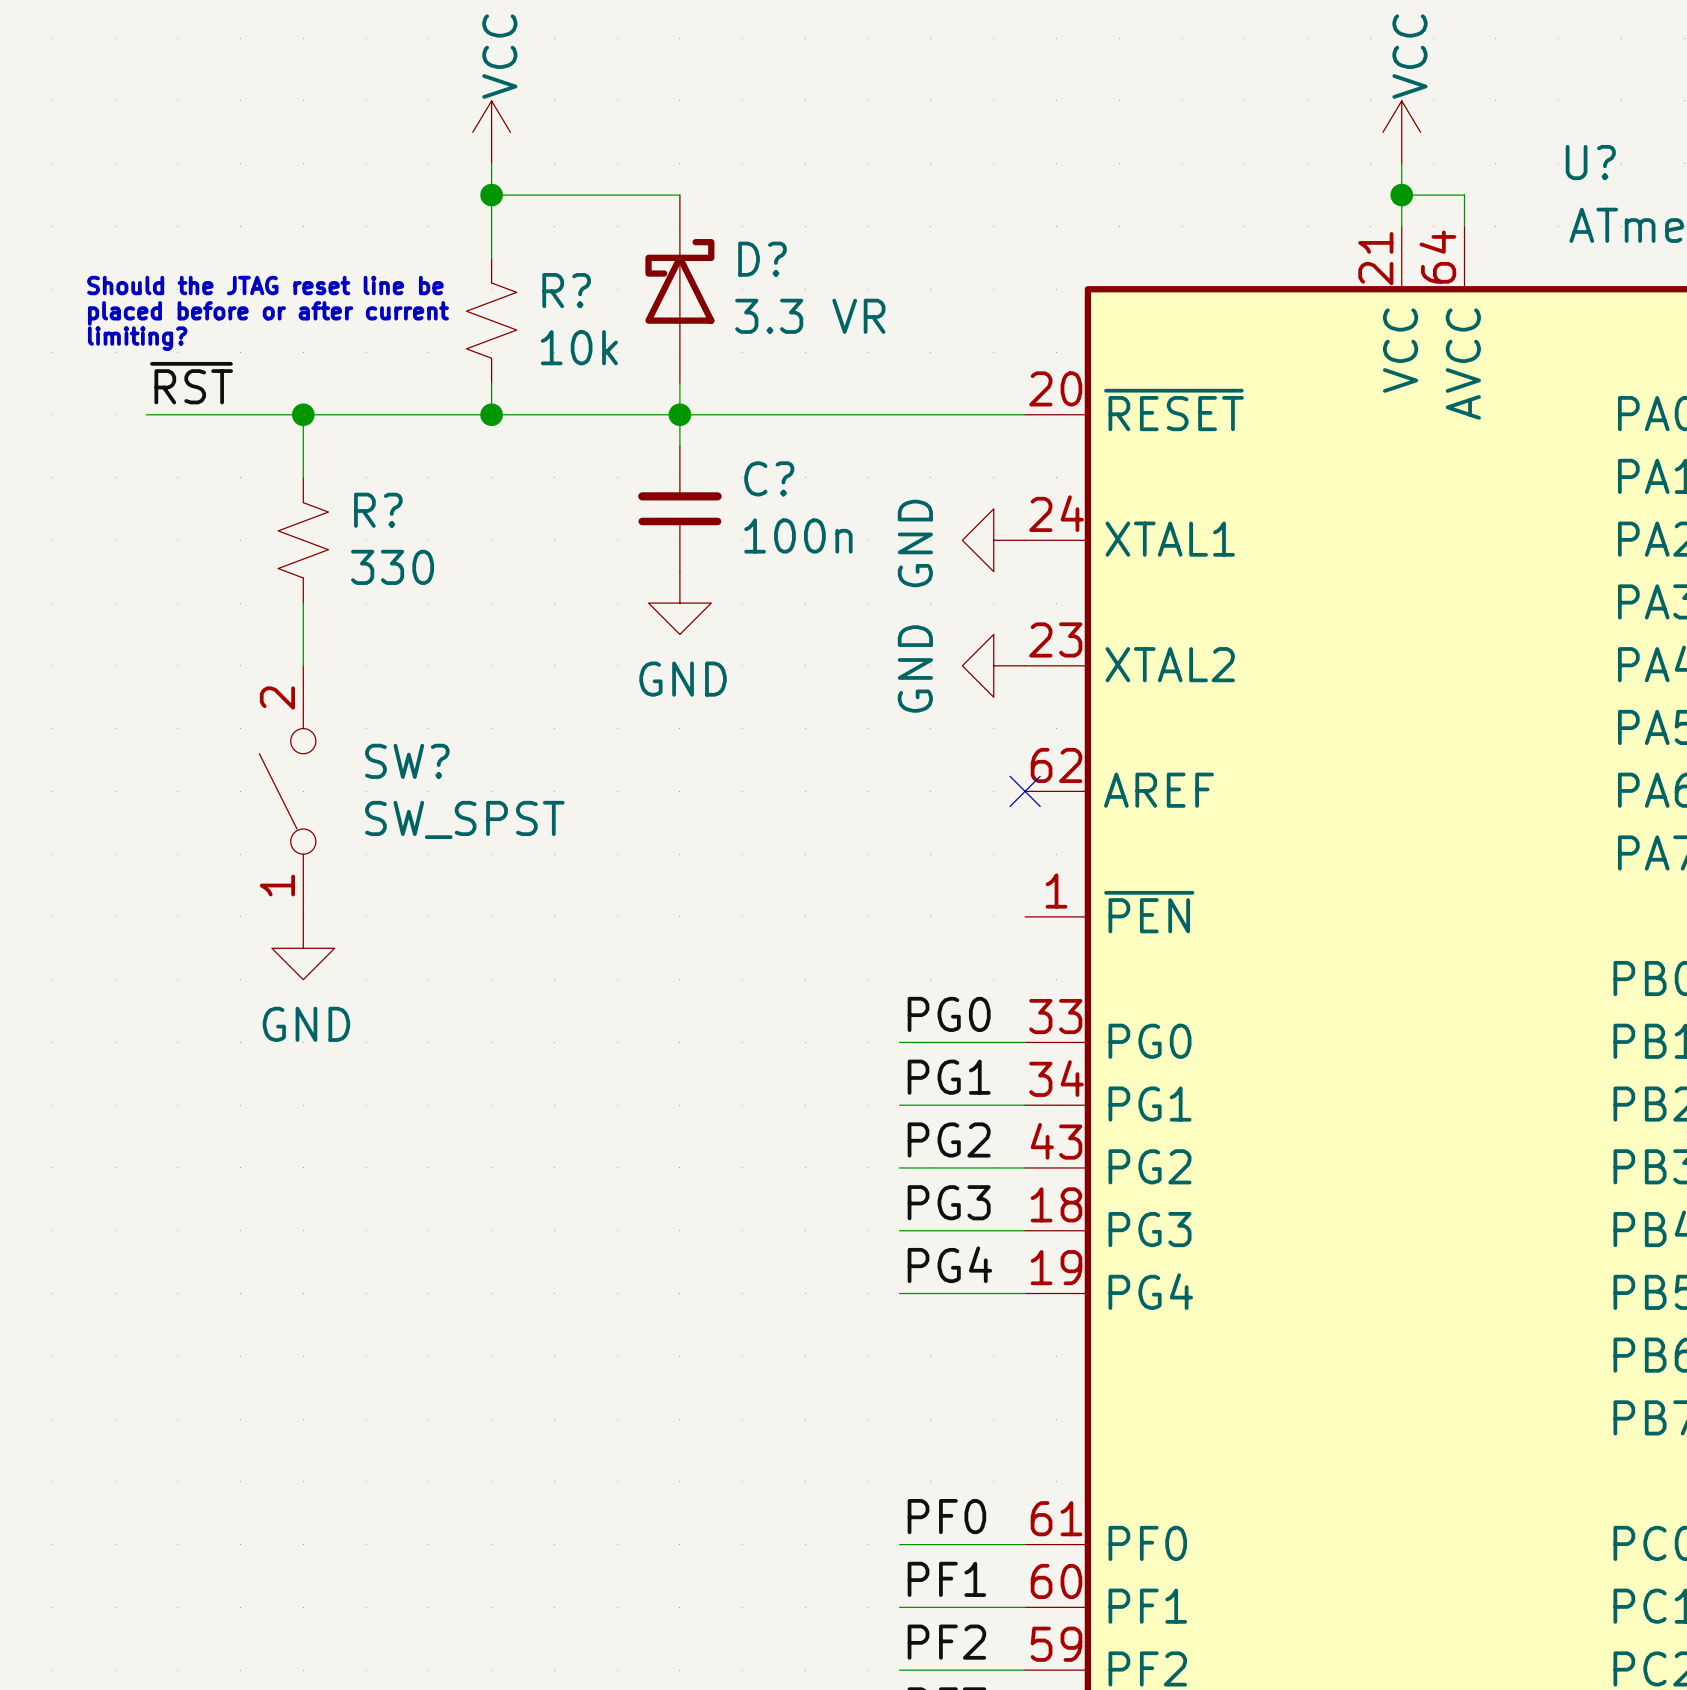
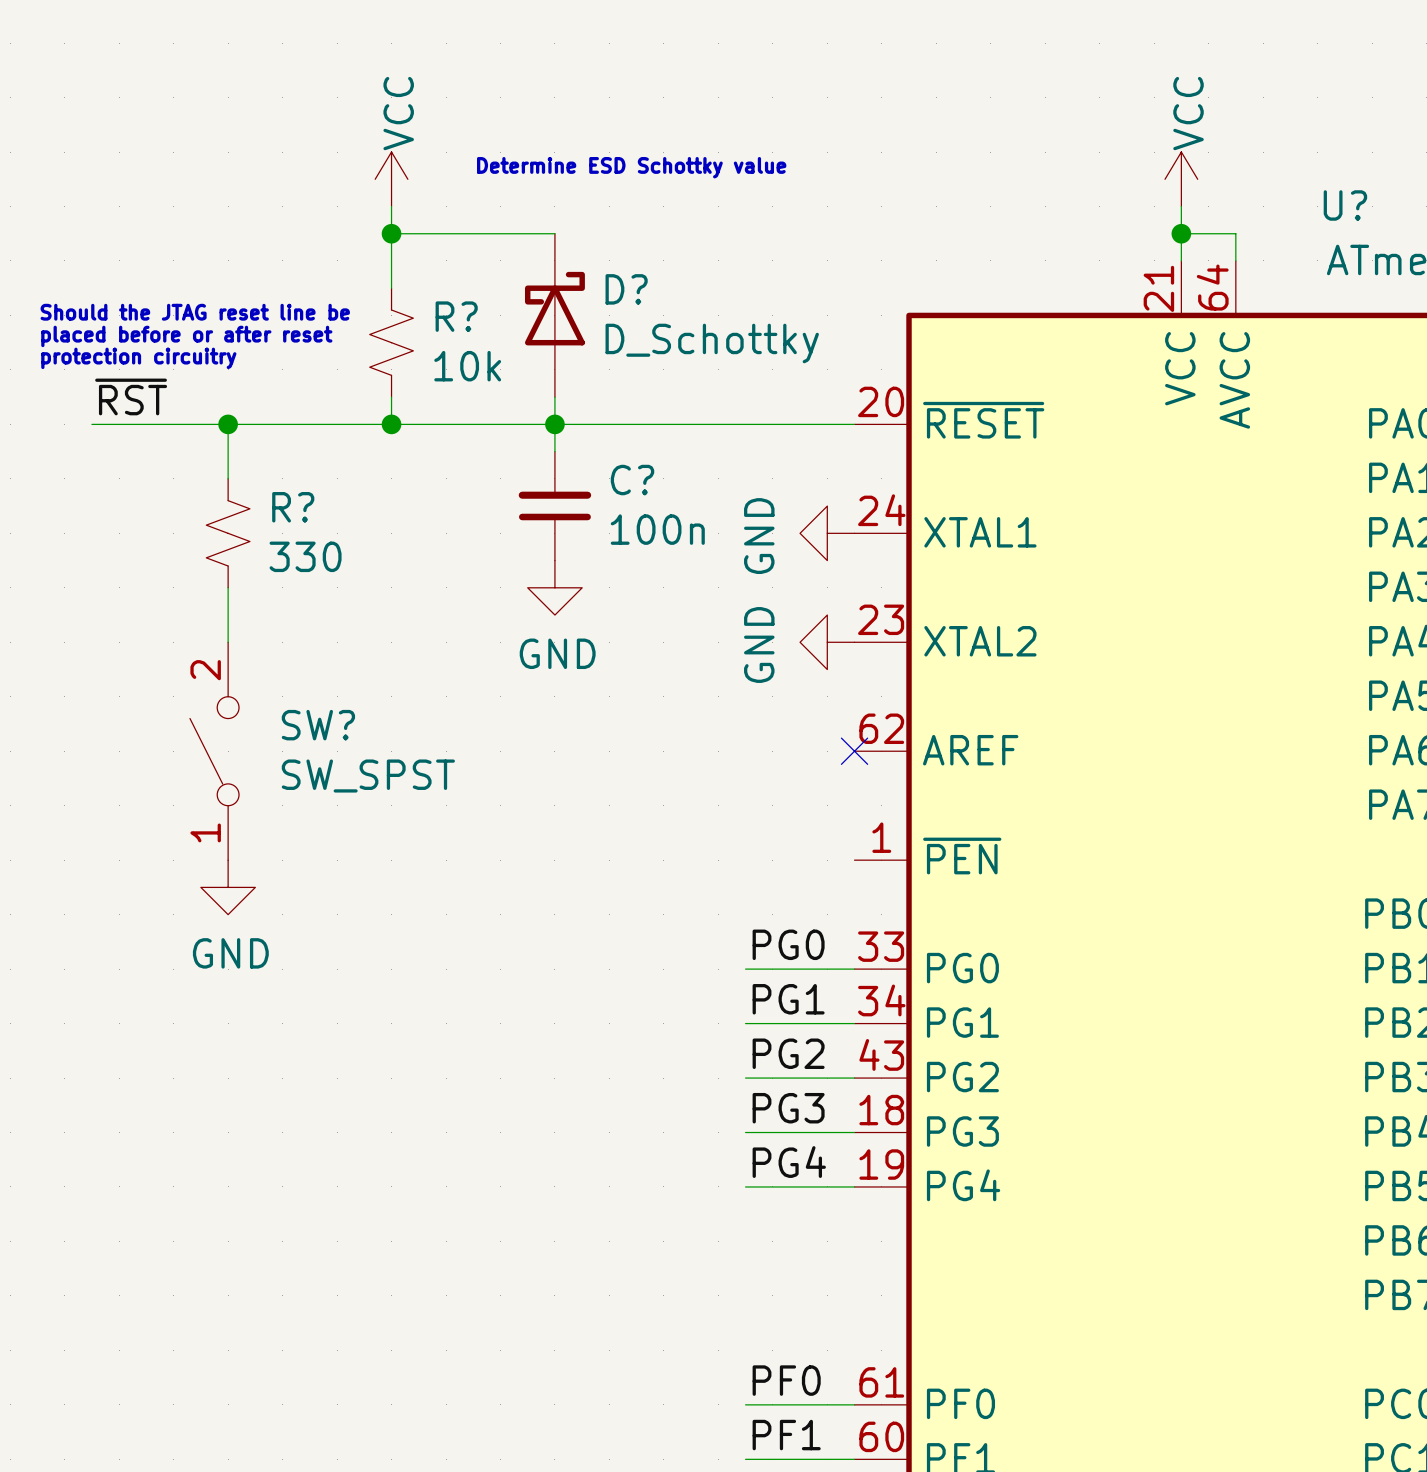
text: none -> Determine ESD Schottky value (631, 167)
text: placed before or after current (268, 313) -> placed before or after reset (186, 336)
D? value: 3.3 VR (810, 316) -> D_Schottky (712, 343)
text: limiting? (137, 338) -> protection circuitry (138, 358)

